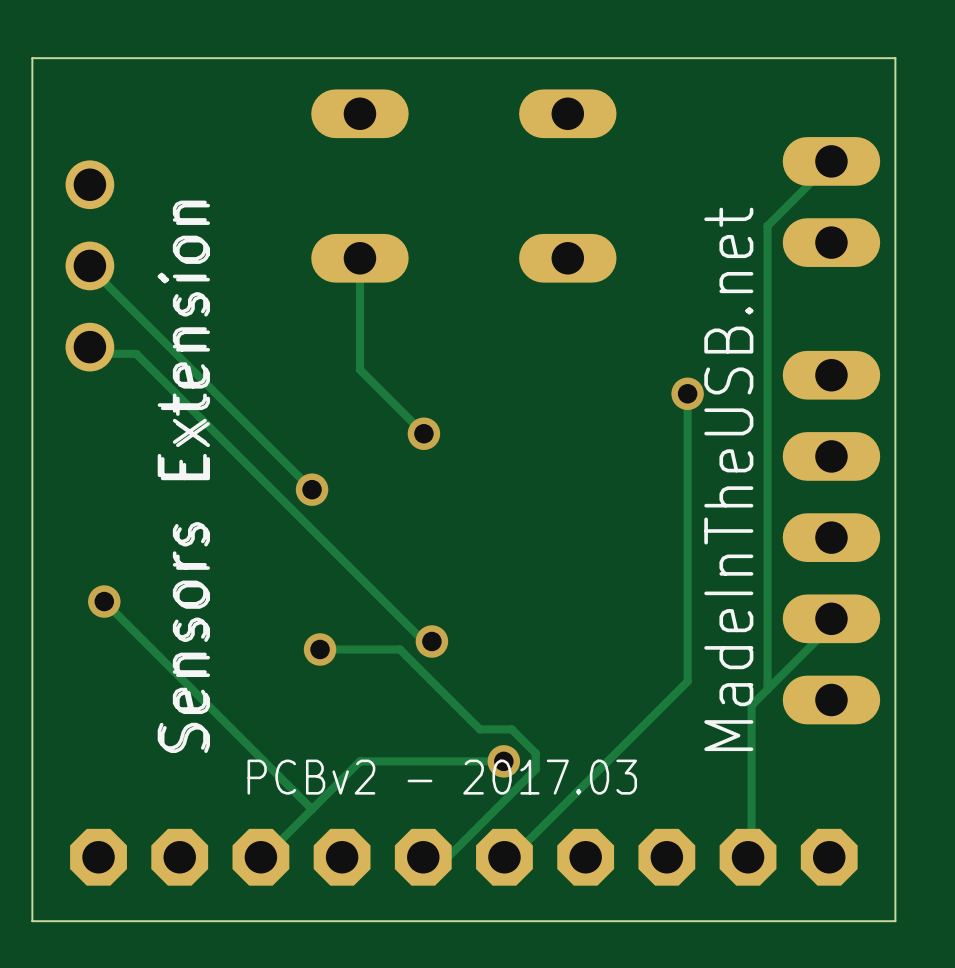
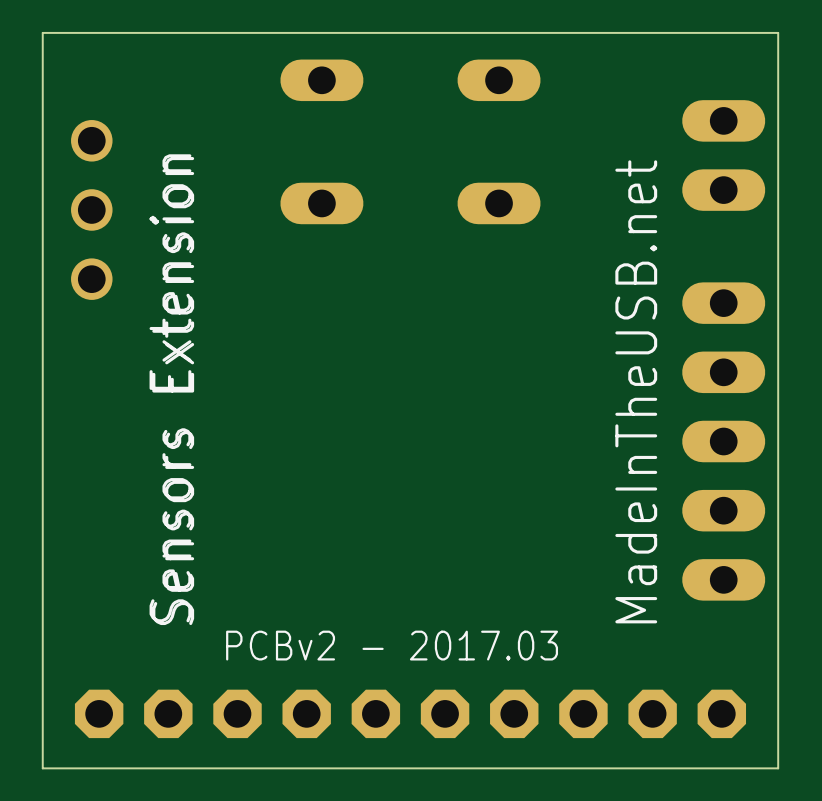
track: (831, 162) (767, 225) (767, 689) -> none
track: (359, 258) (360, 369) (423, 433) -> none
track: (89, 265) (88, 265) (312, 489) -> none
track: (89, 347) (96, 353) (136, 353) (423, 641) (431, 641) -> none
track: (687, 393) (687, 681) (511, 857) (504, 857) -> none
via: (687, 393) -> none
via: (423, 433) -> none
via: (312, 489) -> none
track: (104, 601) (312, 809) -> none
via: (104, 601) -> none
track: (831, 618) (831, 625) (751, 705) (751, 857) (748, 857) -> none
via: (431, 641) -> none
track: (320, 649) (399, 649) (479, 729) (511, 729) (535, 753) (535, 769) (447, 857) (423, 857) -> none
via: (320, 649) -> none
track: (503, 761) (360, 761) (264, 857) (260, 857) -> none
via: (503, 761) -> none

